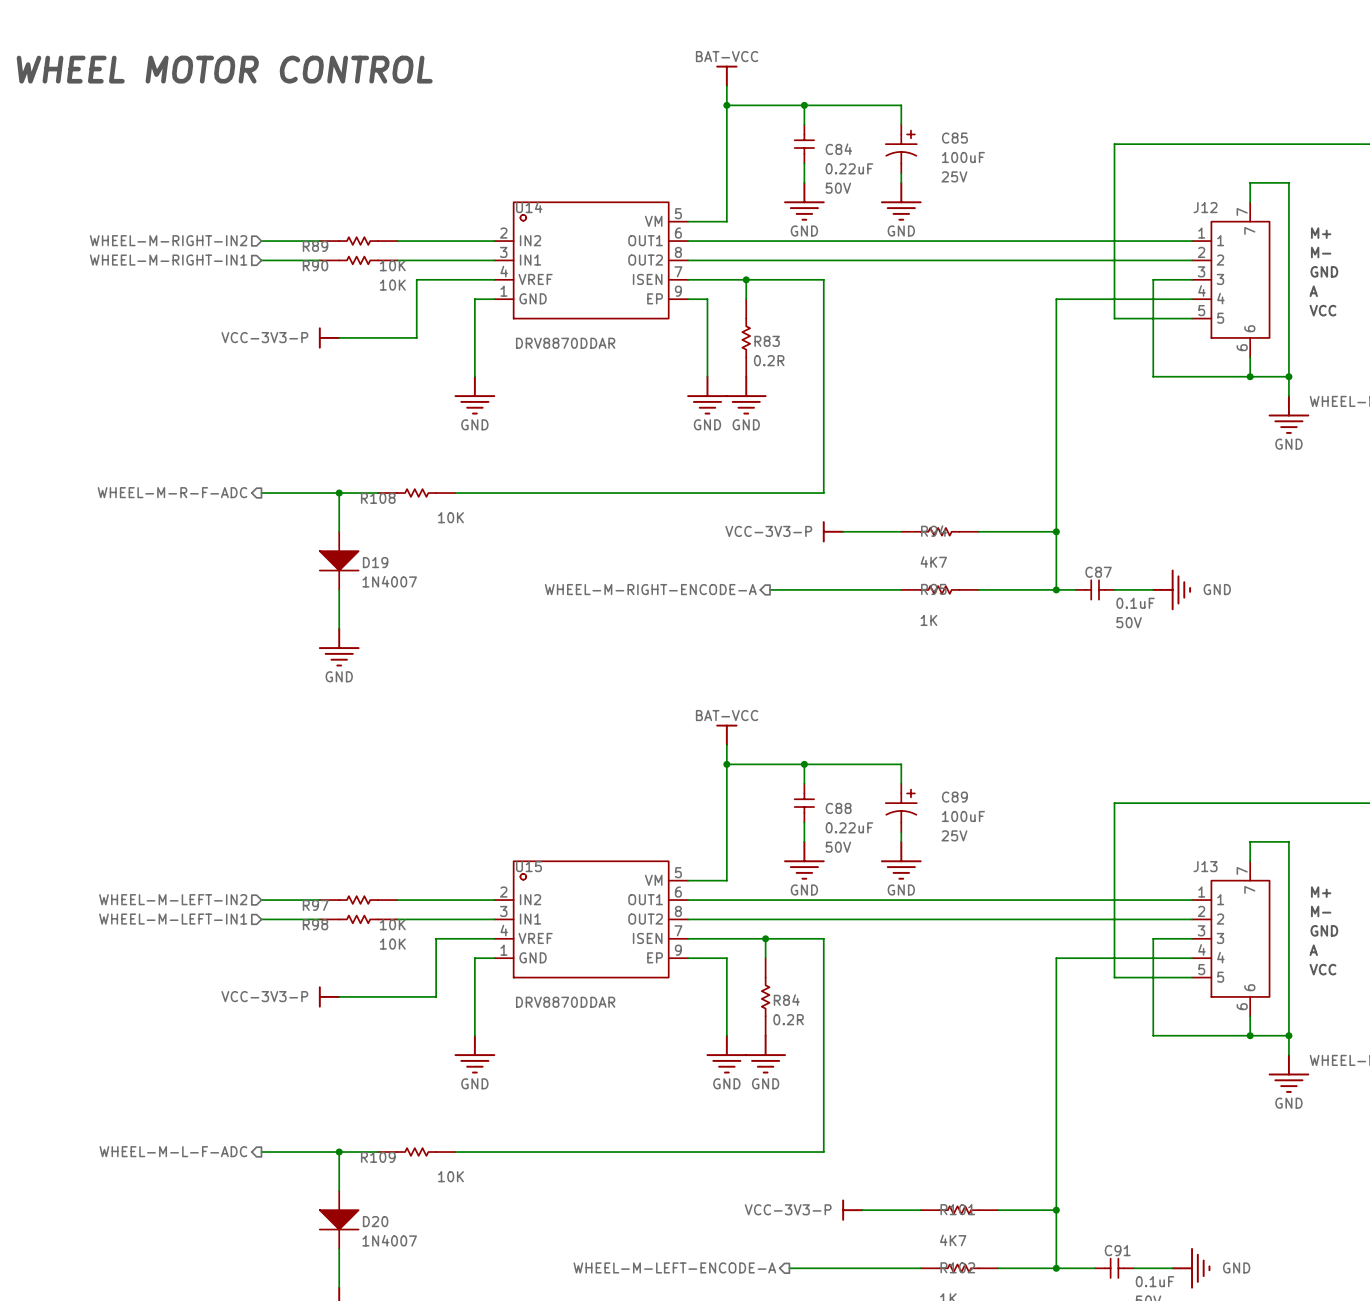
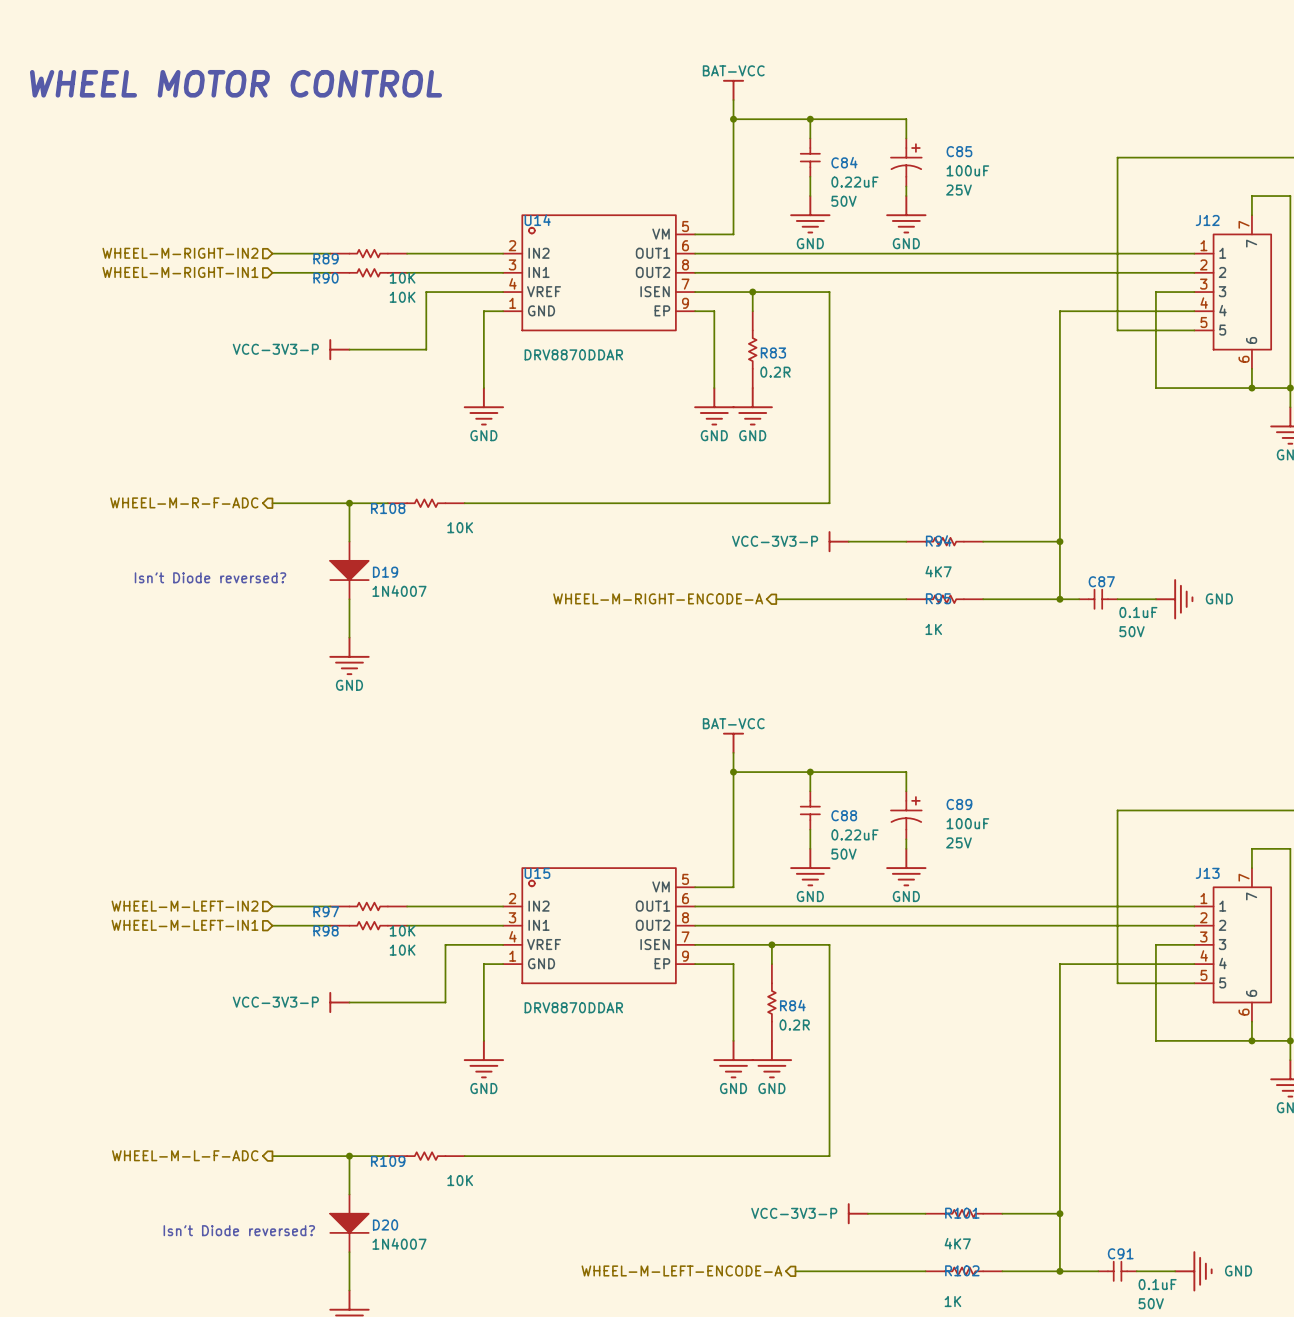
text: none -> Isn't Diode reversed? (210, 577)
text: none -> Isn't Diode reversed? (239, 1230)

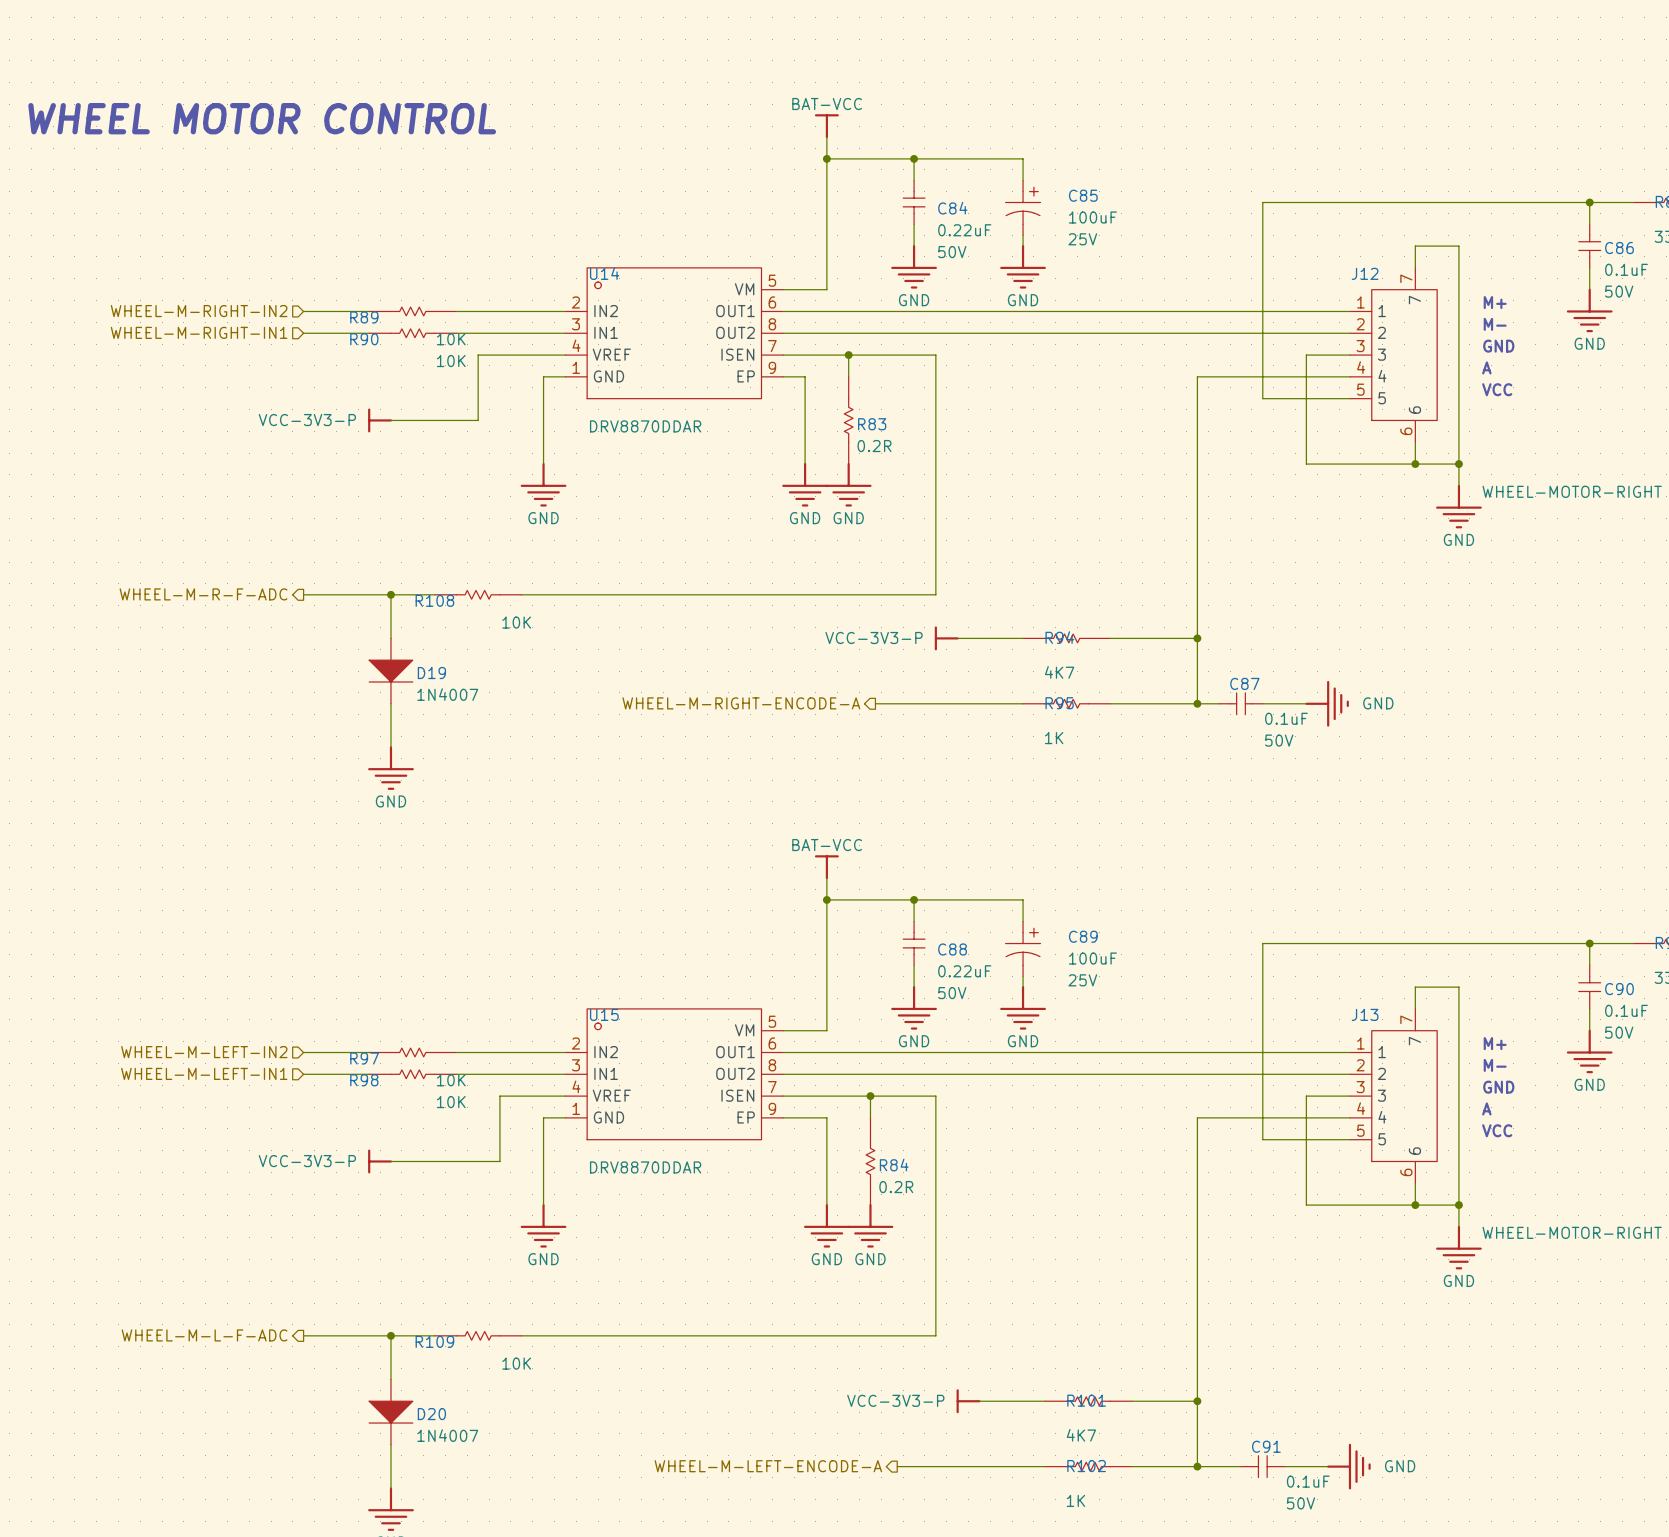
text: Isn't Diode reversed? (210, 577) -> none
text: Isn't Diode reversed? (239, 1230) -> none

